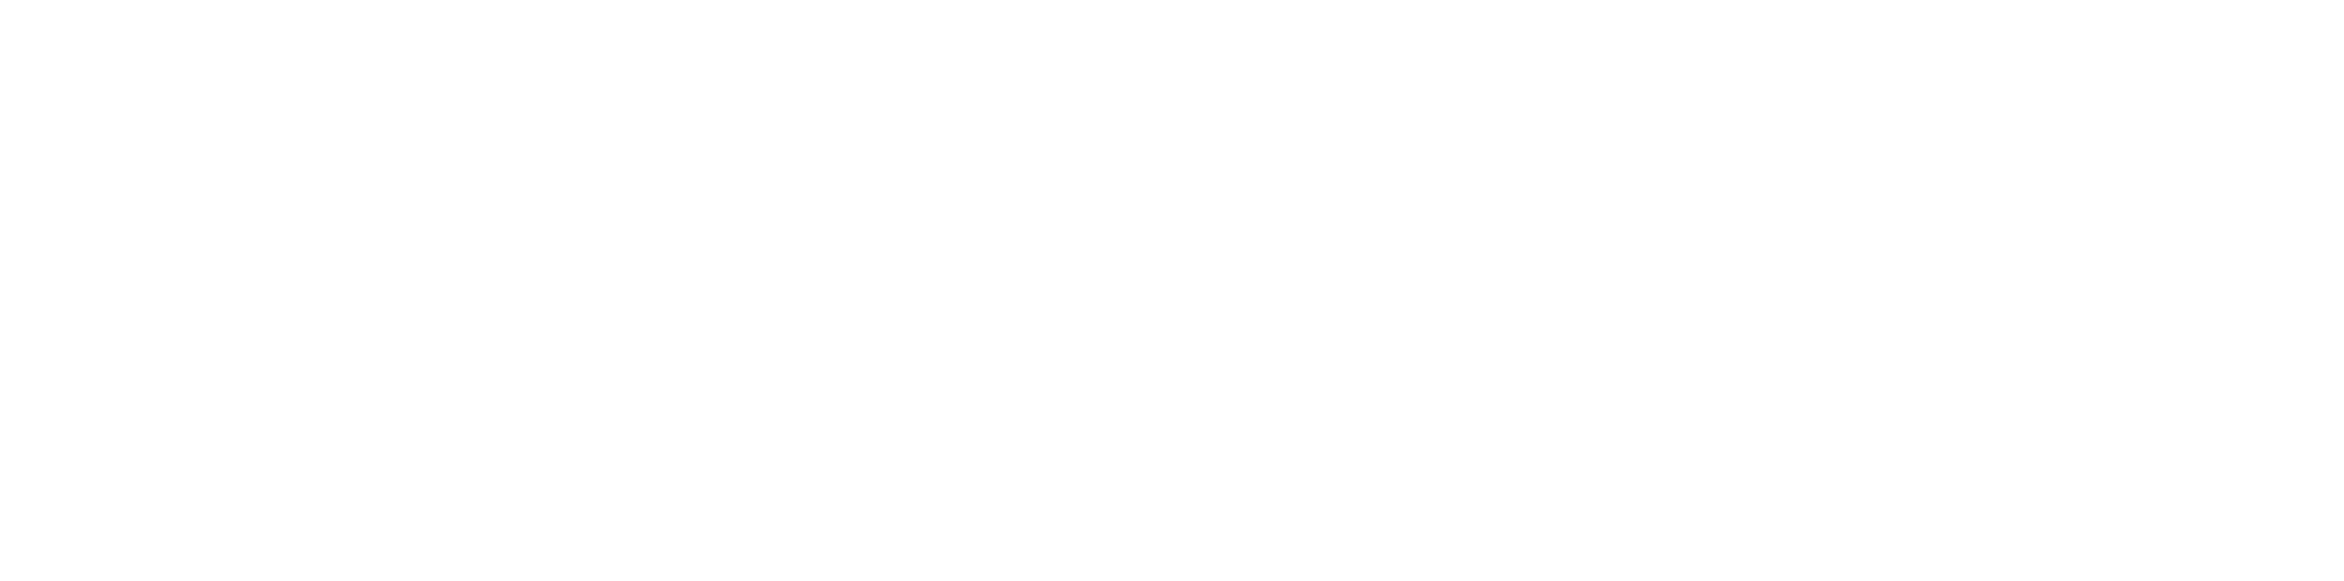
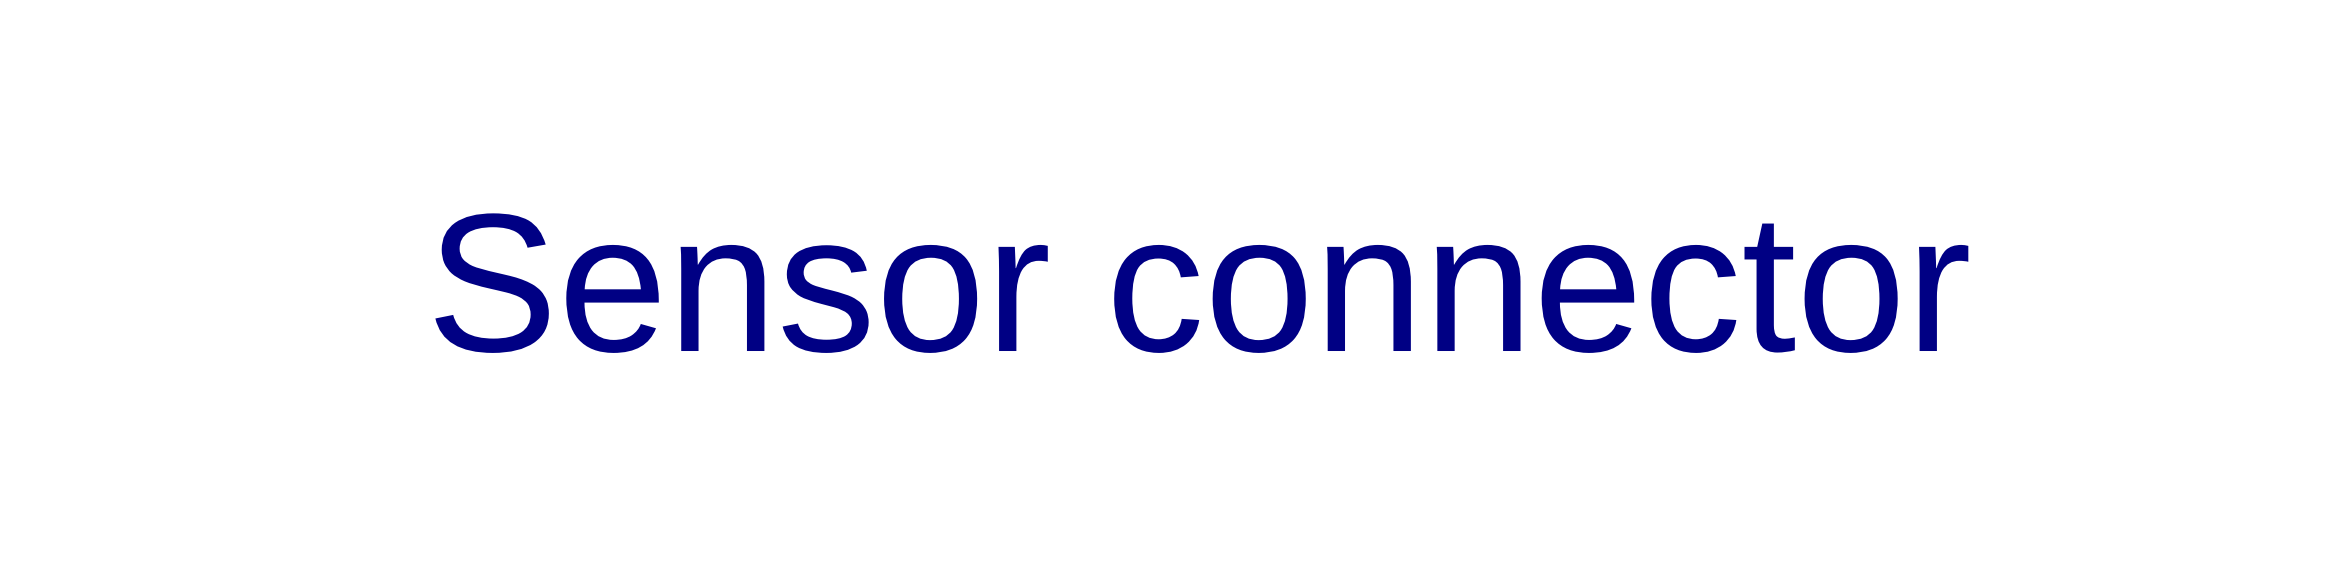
text: none -> Sensor connector (1201, 283)

